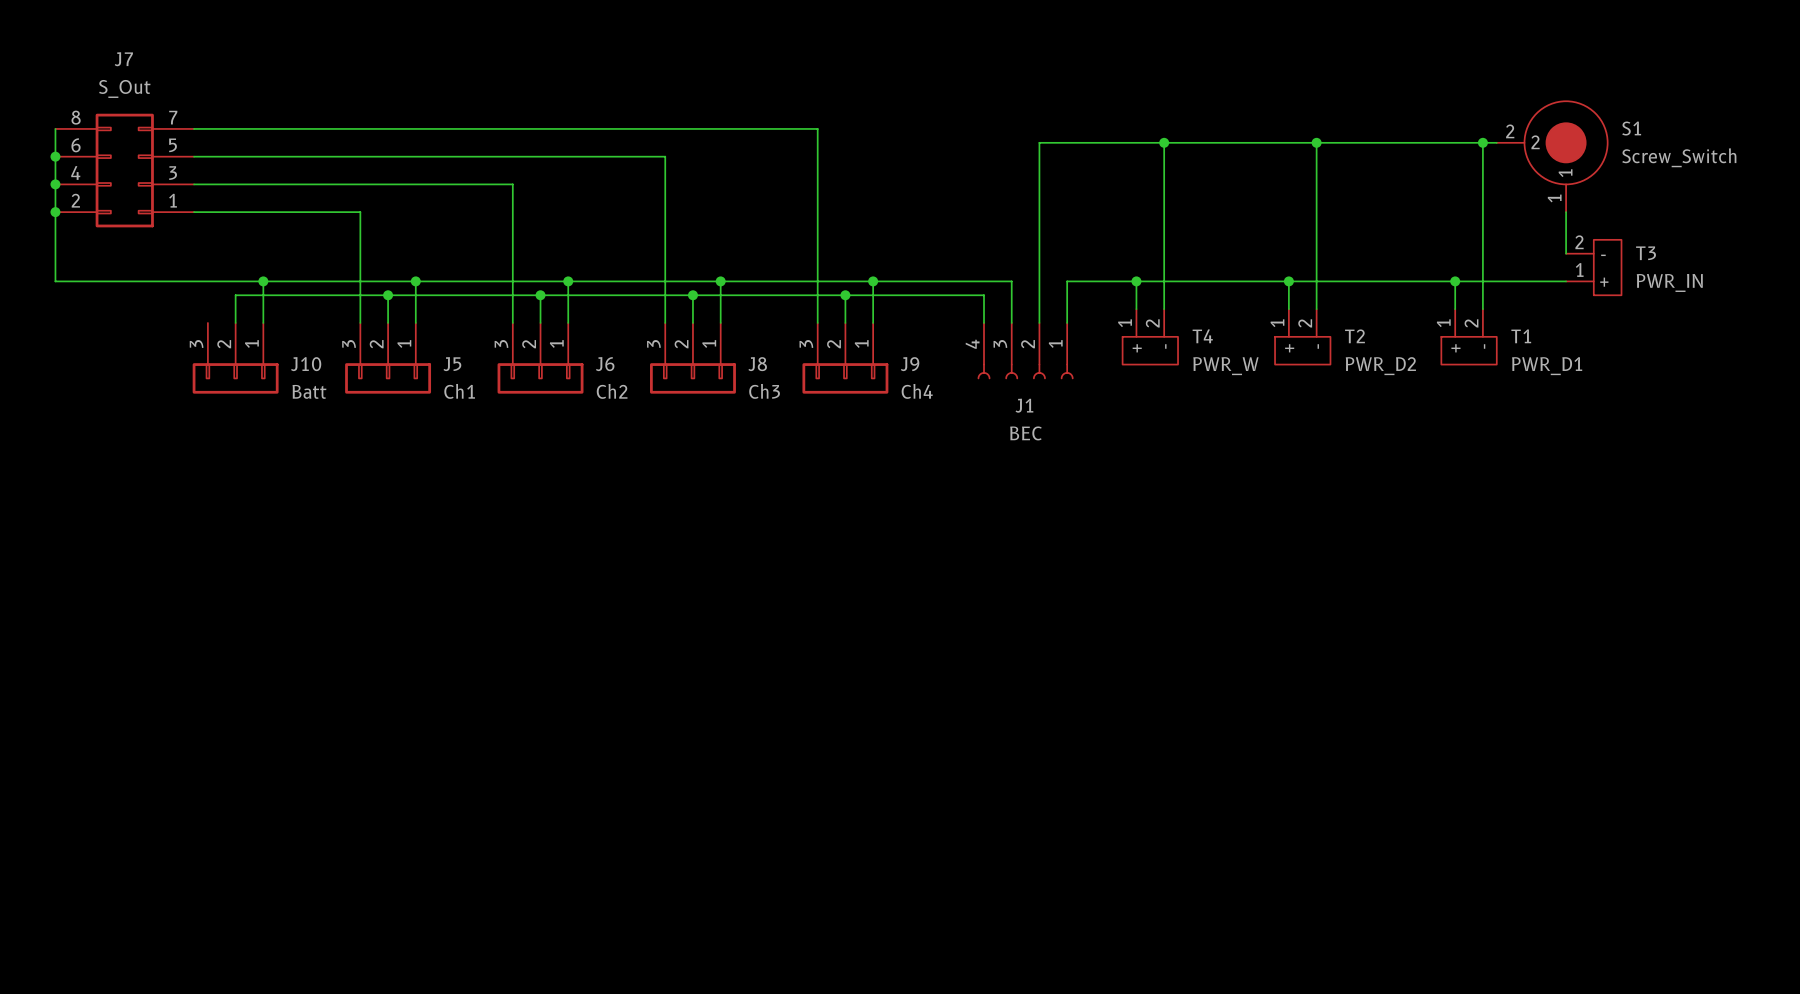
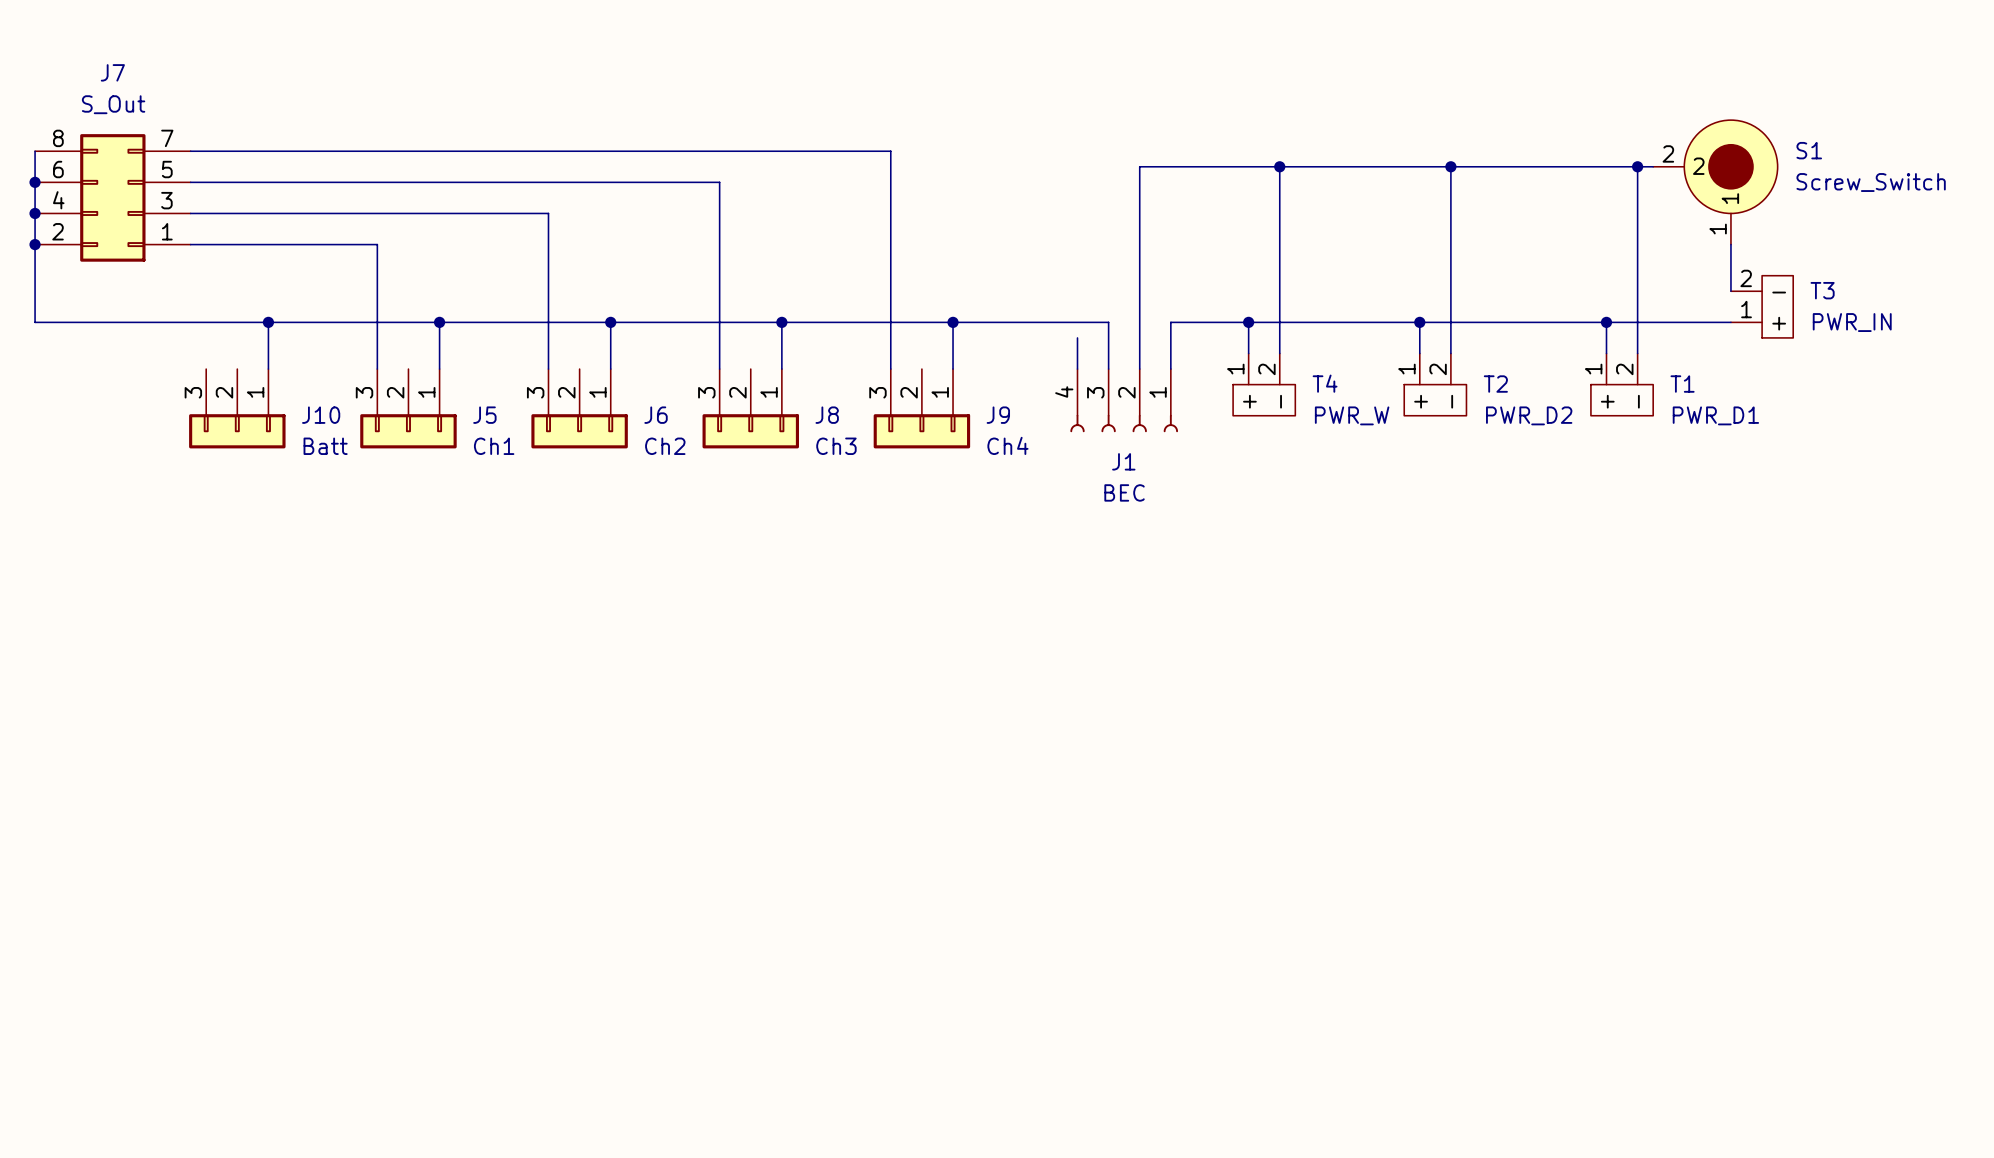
wire: (388, 295) (388, 322) -> none
junction: (388, 295) -> none
wire: (540, 295) (540, 322) -> none
junction: (540, 295) -> none
wire: (692, 295) (692, 322) -> none
junction: (692, 295) -> none
wire: (845, 295) (845, 322) -> none
junction: (845, 295) -> none
wire: (984, 295) (235, 295) (235, 322) -> none

